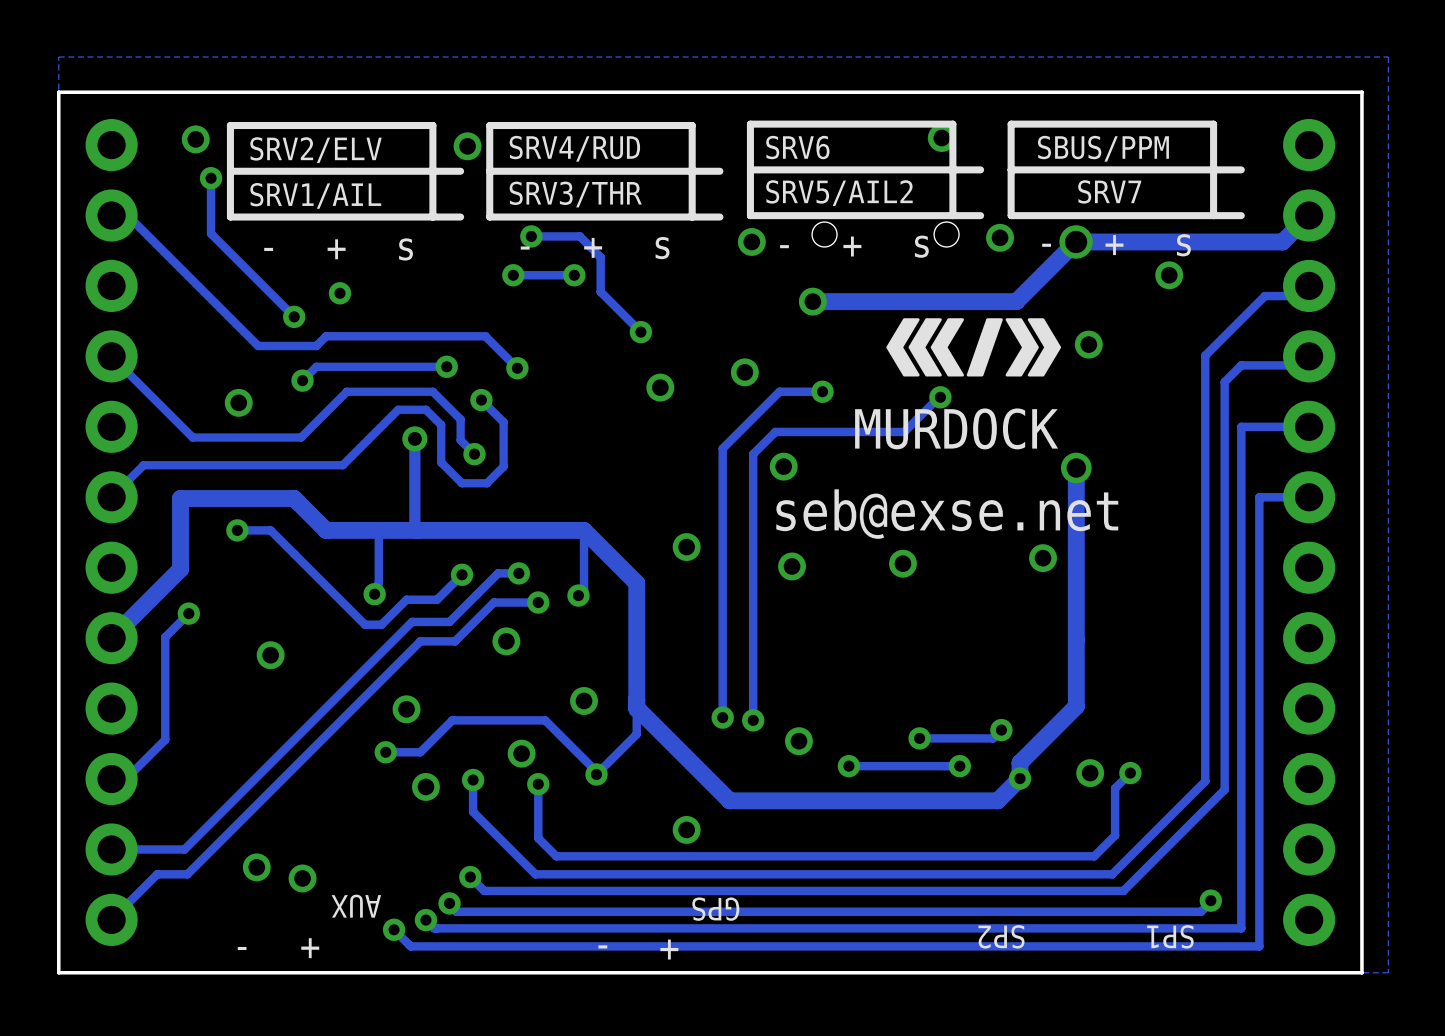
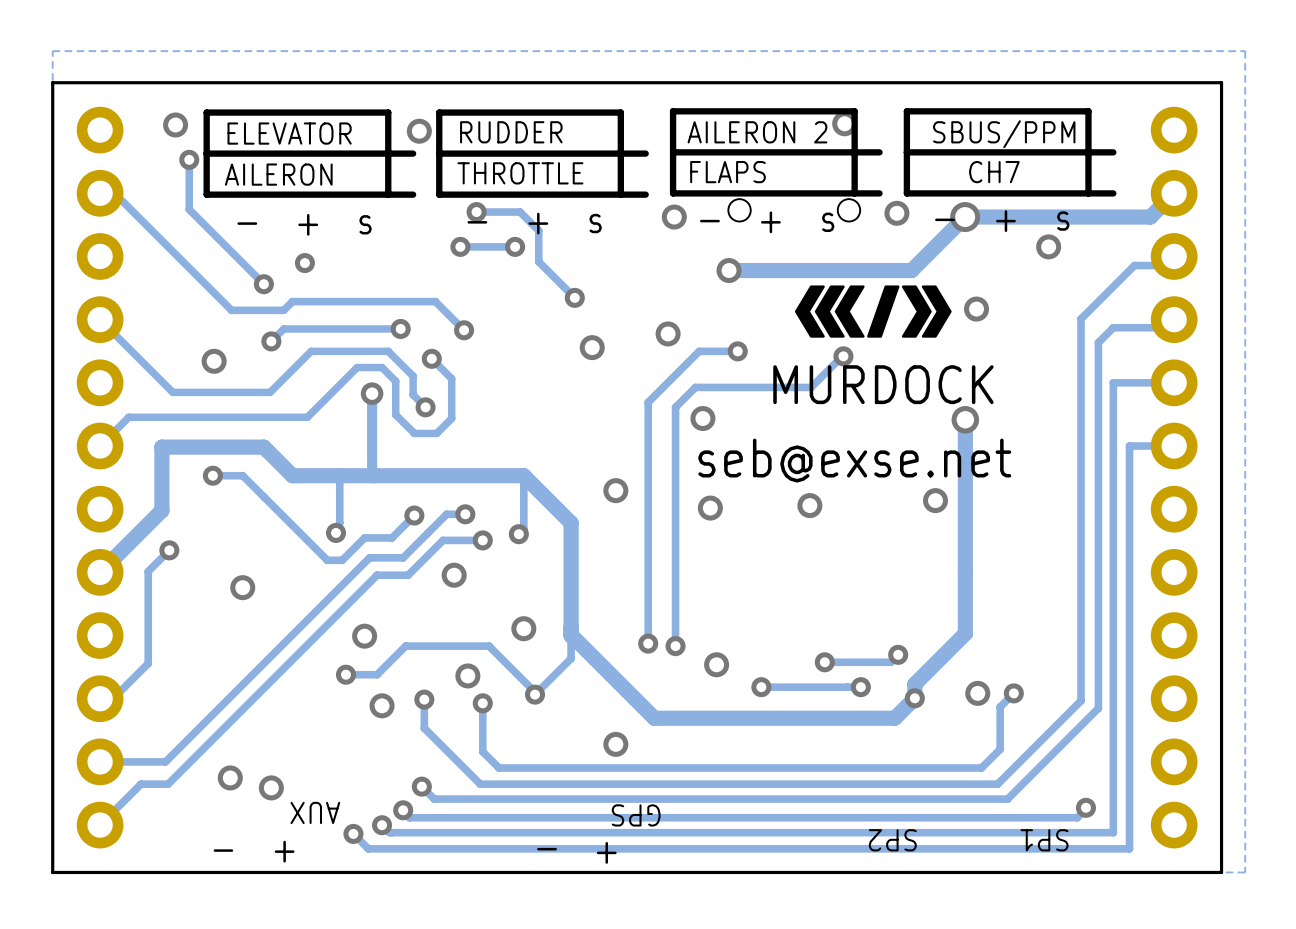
text: SRV6 (797, 147) -> AILERON 2 (757, 132)
text: SRV4/RUD (574, 148) -> RUDDER (511, 132)
text: SRV2/ELV (316, 150) -> ELEVATOR (289, 133)
text: SRV7 (1109, 191) -> CH7 (994, 172)
text: SRV5/AIL2 (839, 193) -> FLAPS (727, 172)
text: SRV3/THR (575, 194) -> THROTTLE (520, 173)
text: SRV1/AIL (315, 195) -> AILERON (278, 174)

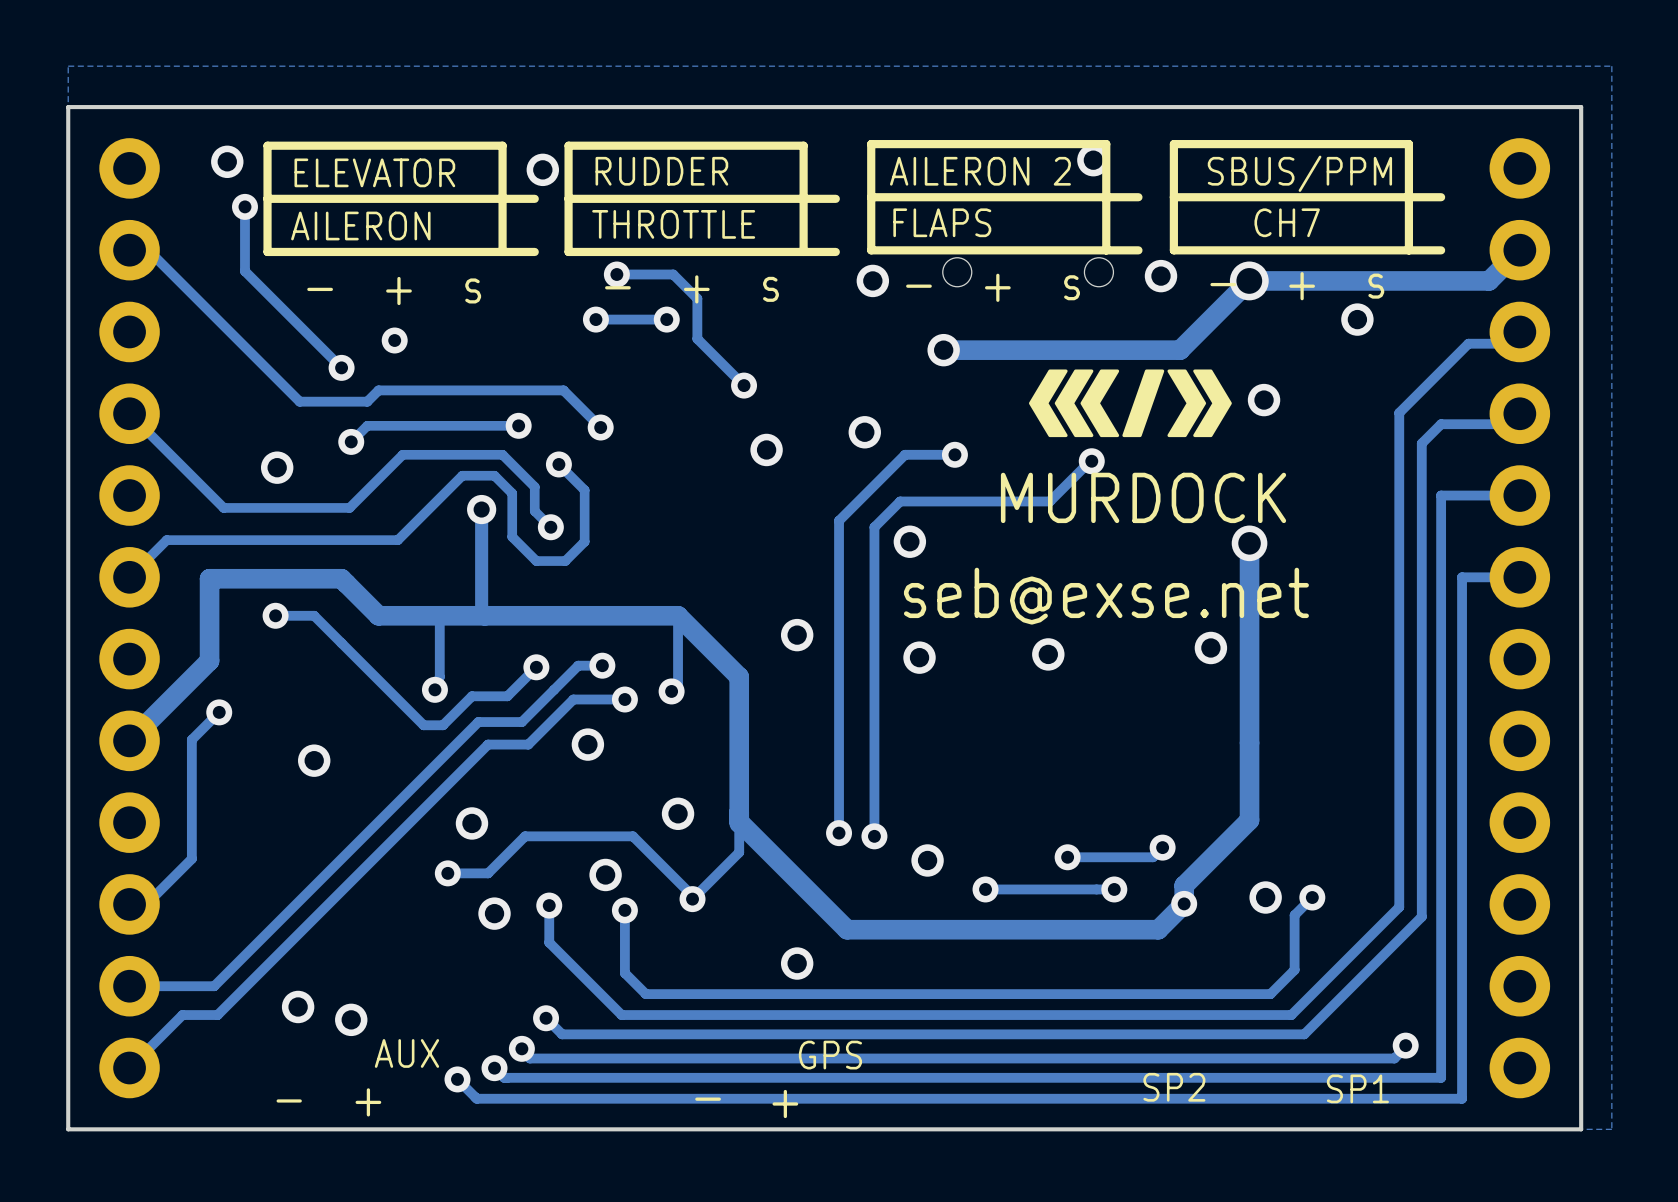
text rotation: 0° (315, 812) -> 180° (406, 1053)
text rotation: 0° (636, 815) -> 180° (830, 1055)
text rotation: 0° (892, 840) -> 180° (1174, 1087)
text rotation: 0° (1044, 840) -> 180° (1357, 1088)

